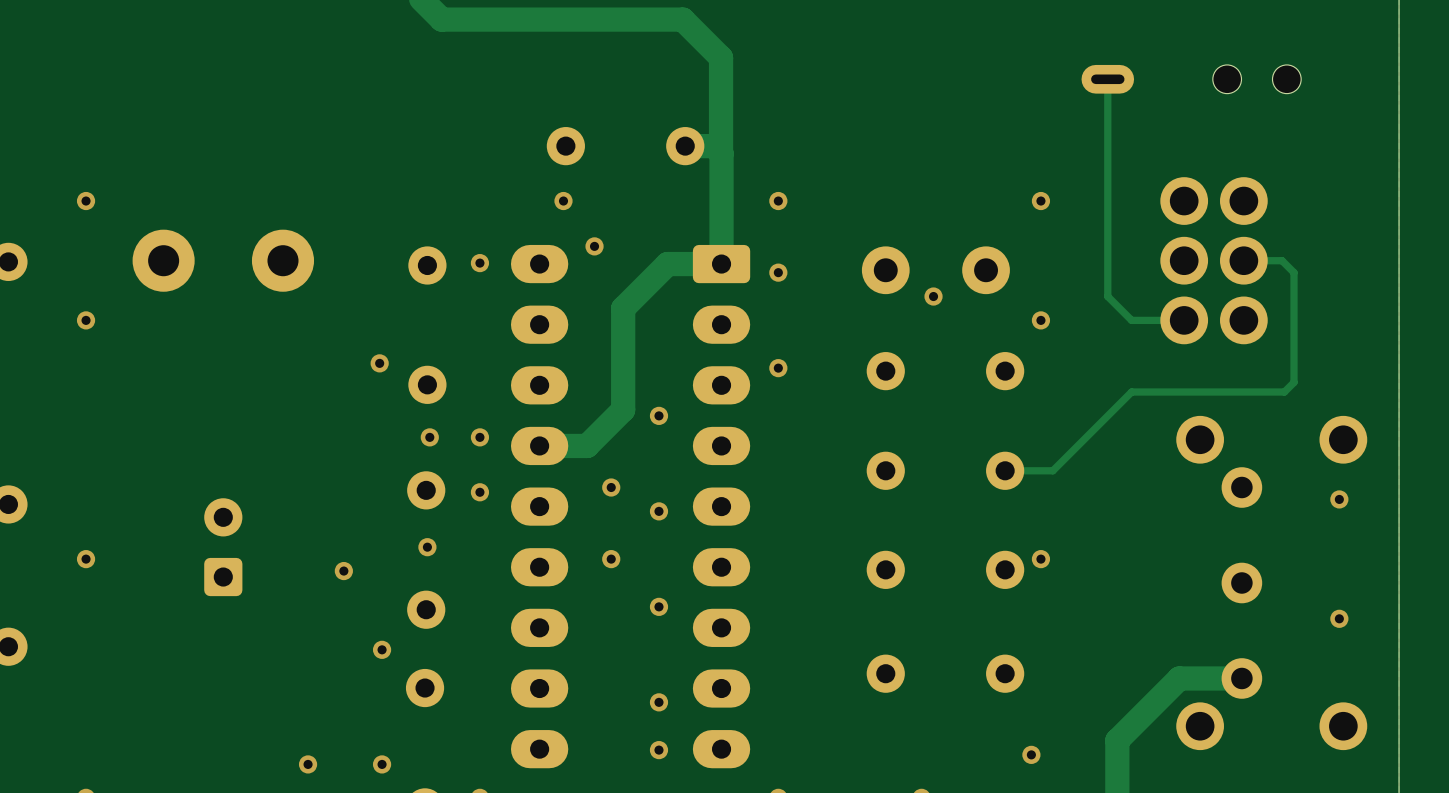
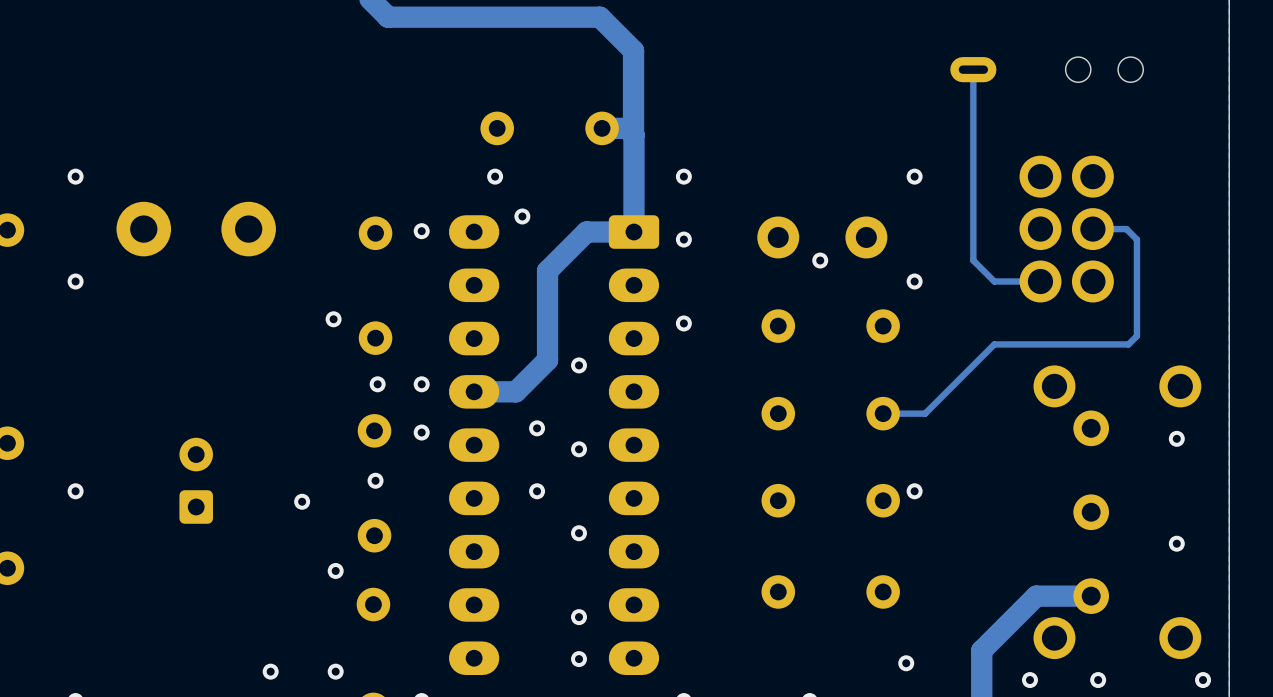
via: none -> (1029, 680)
via: none -> (1098, 680)
via: none -> (1203, 680)

